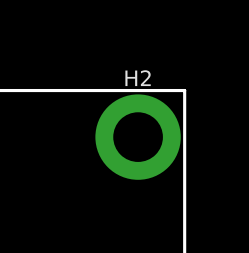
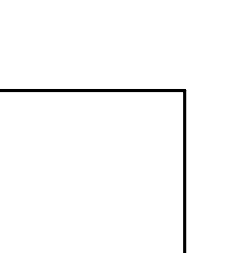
H2: (138, 137) -> none

